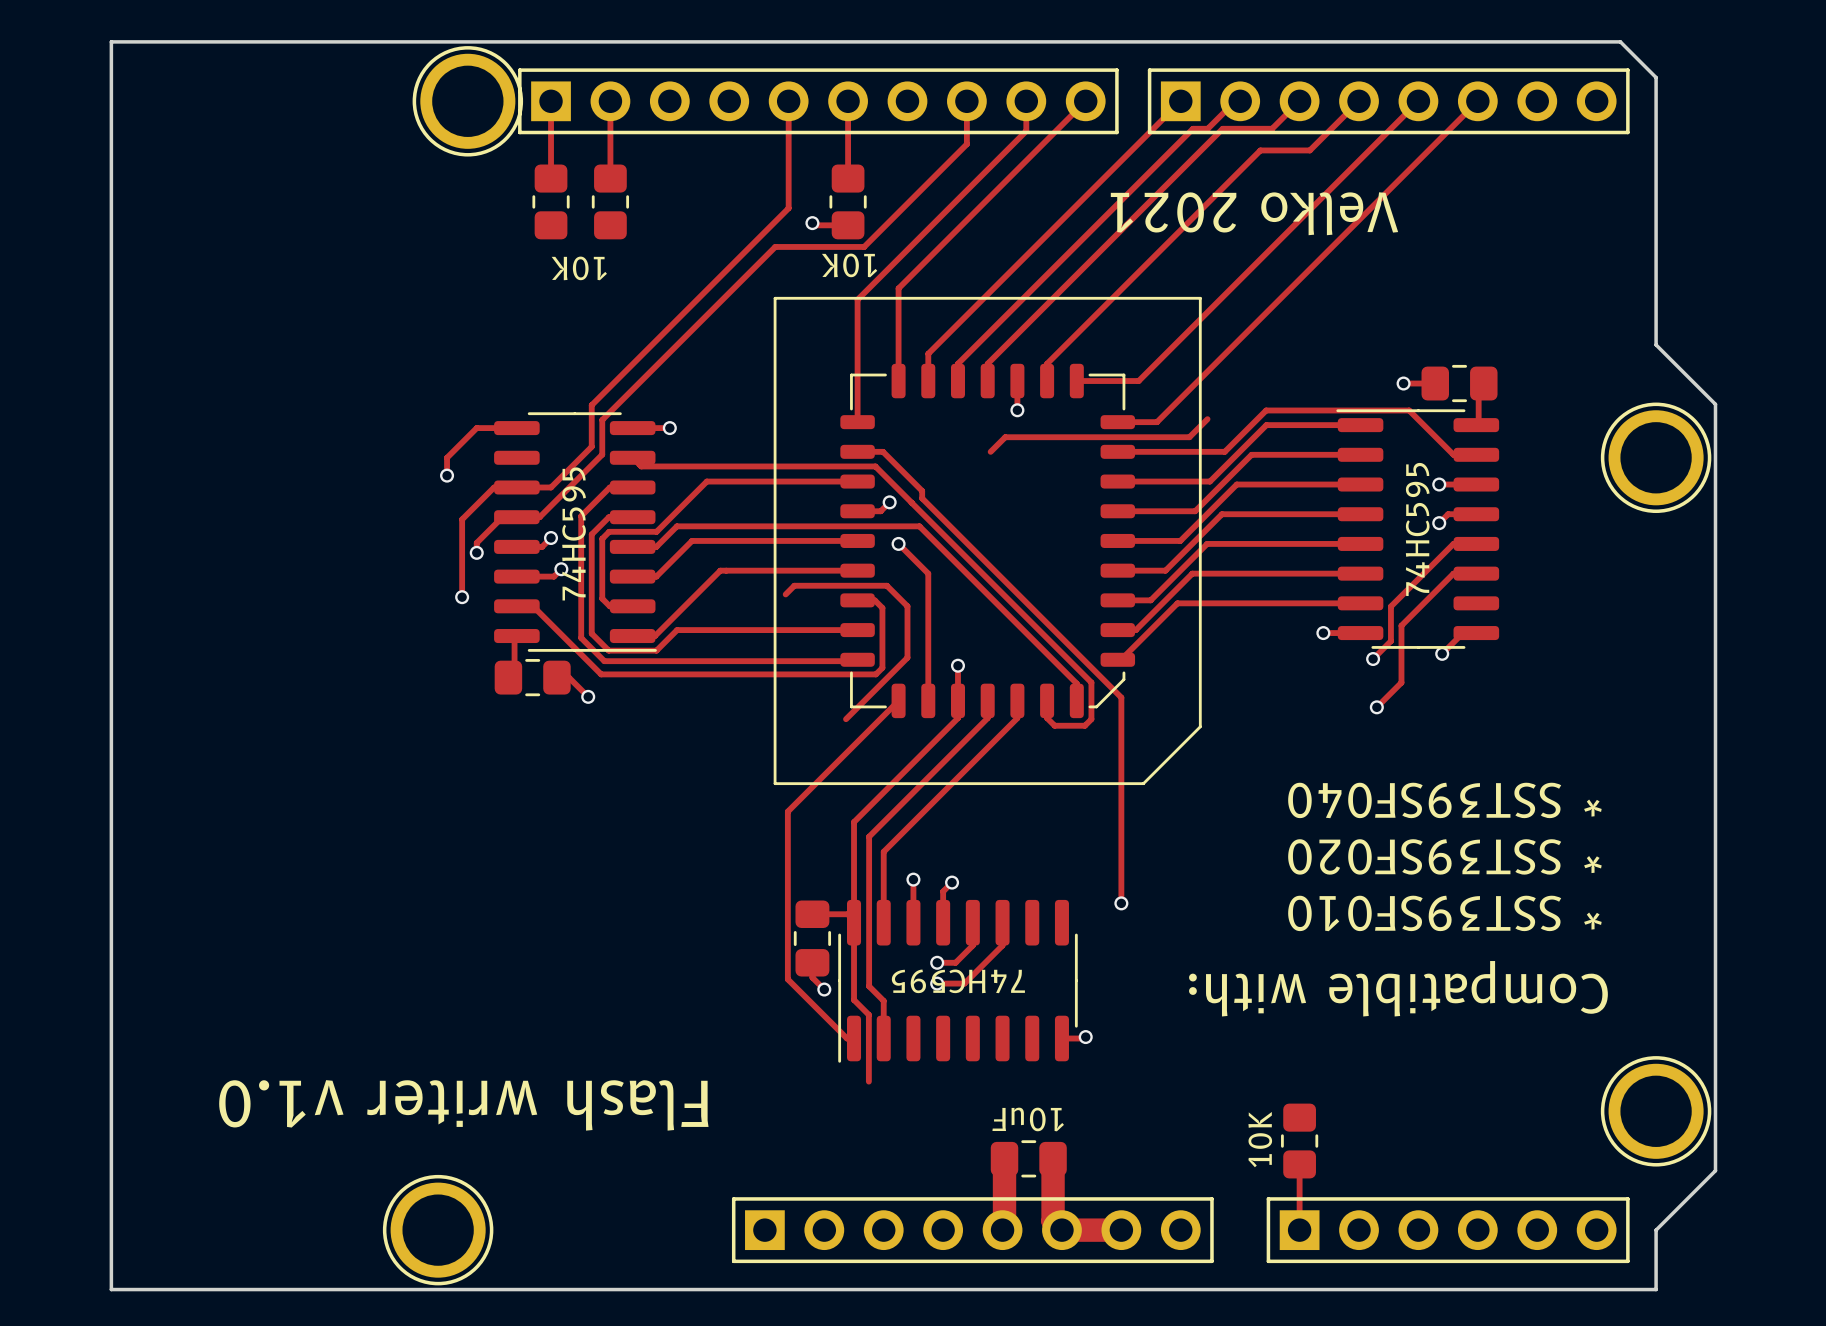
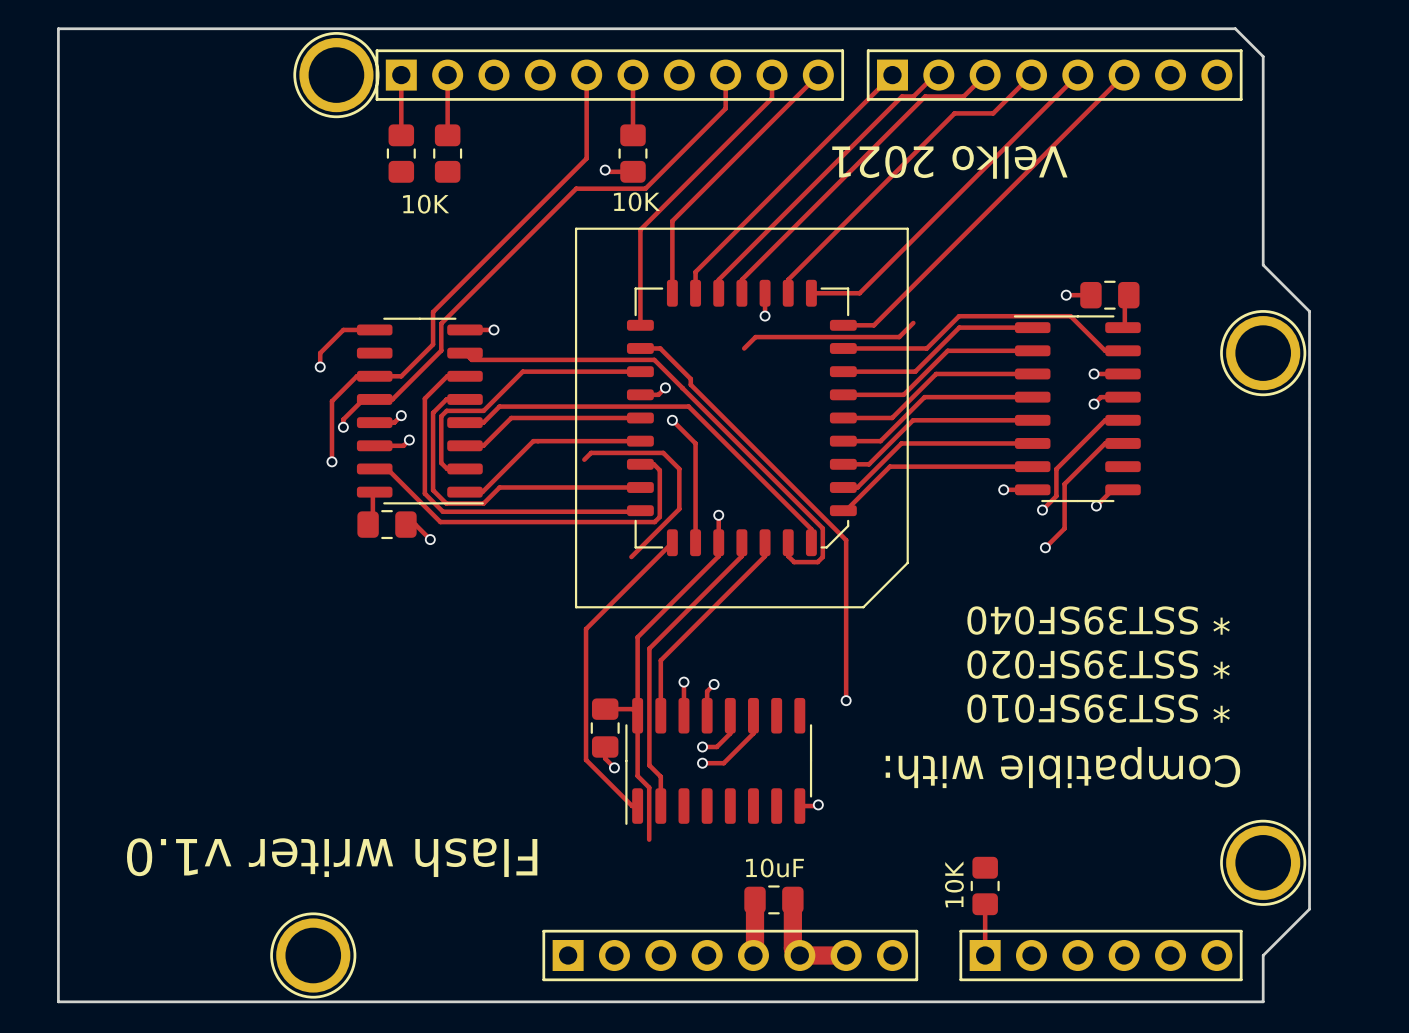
part value rotation: 0° (849, 265) -> 180° (636, 201)
part value rotation: 0° (579, 268) -> 180° (426, 204)
part value: 74HC595 (1417, 529) -> none
part value: 74HC595 (574, 533) -> none
part value: 74HC595 (958, 981) -> none
part value rotation: 0° (1028, 1119) -> 180° (774, 867)

